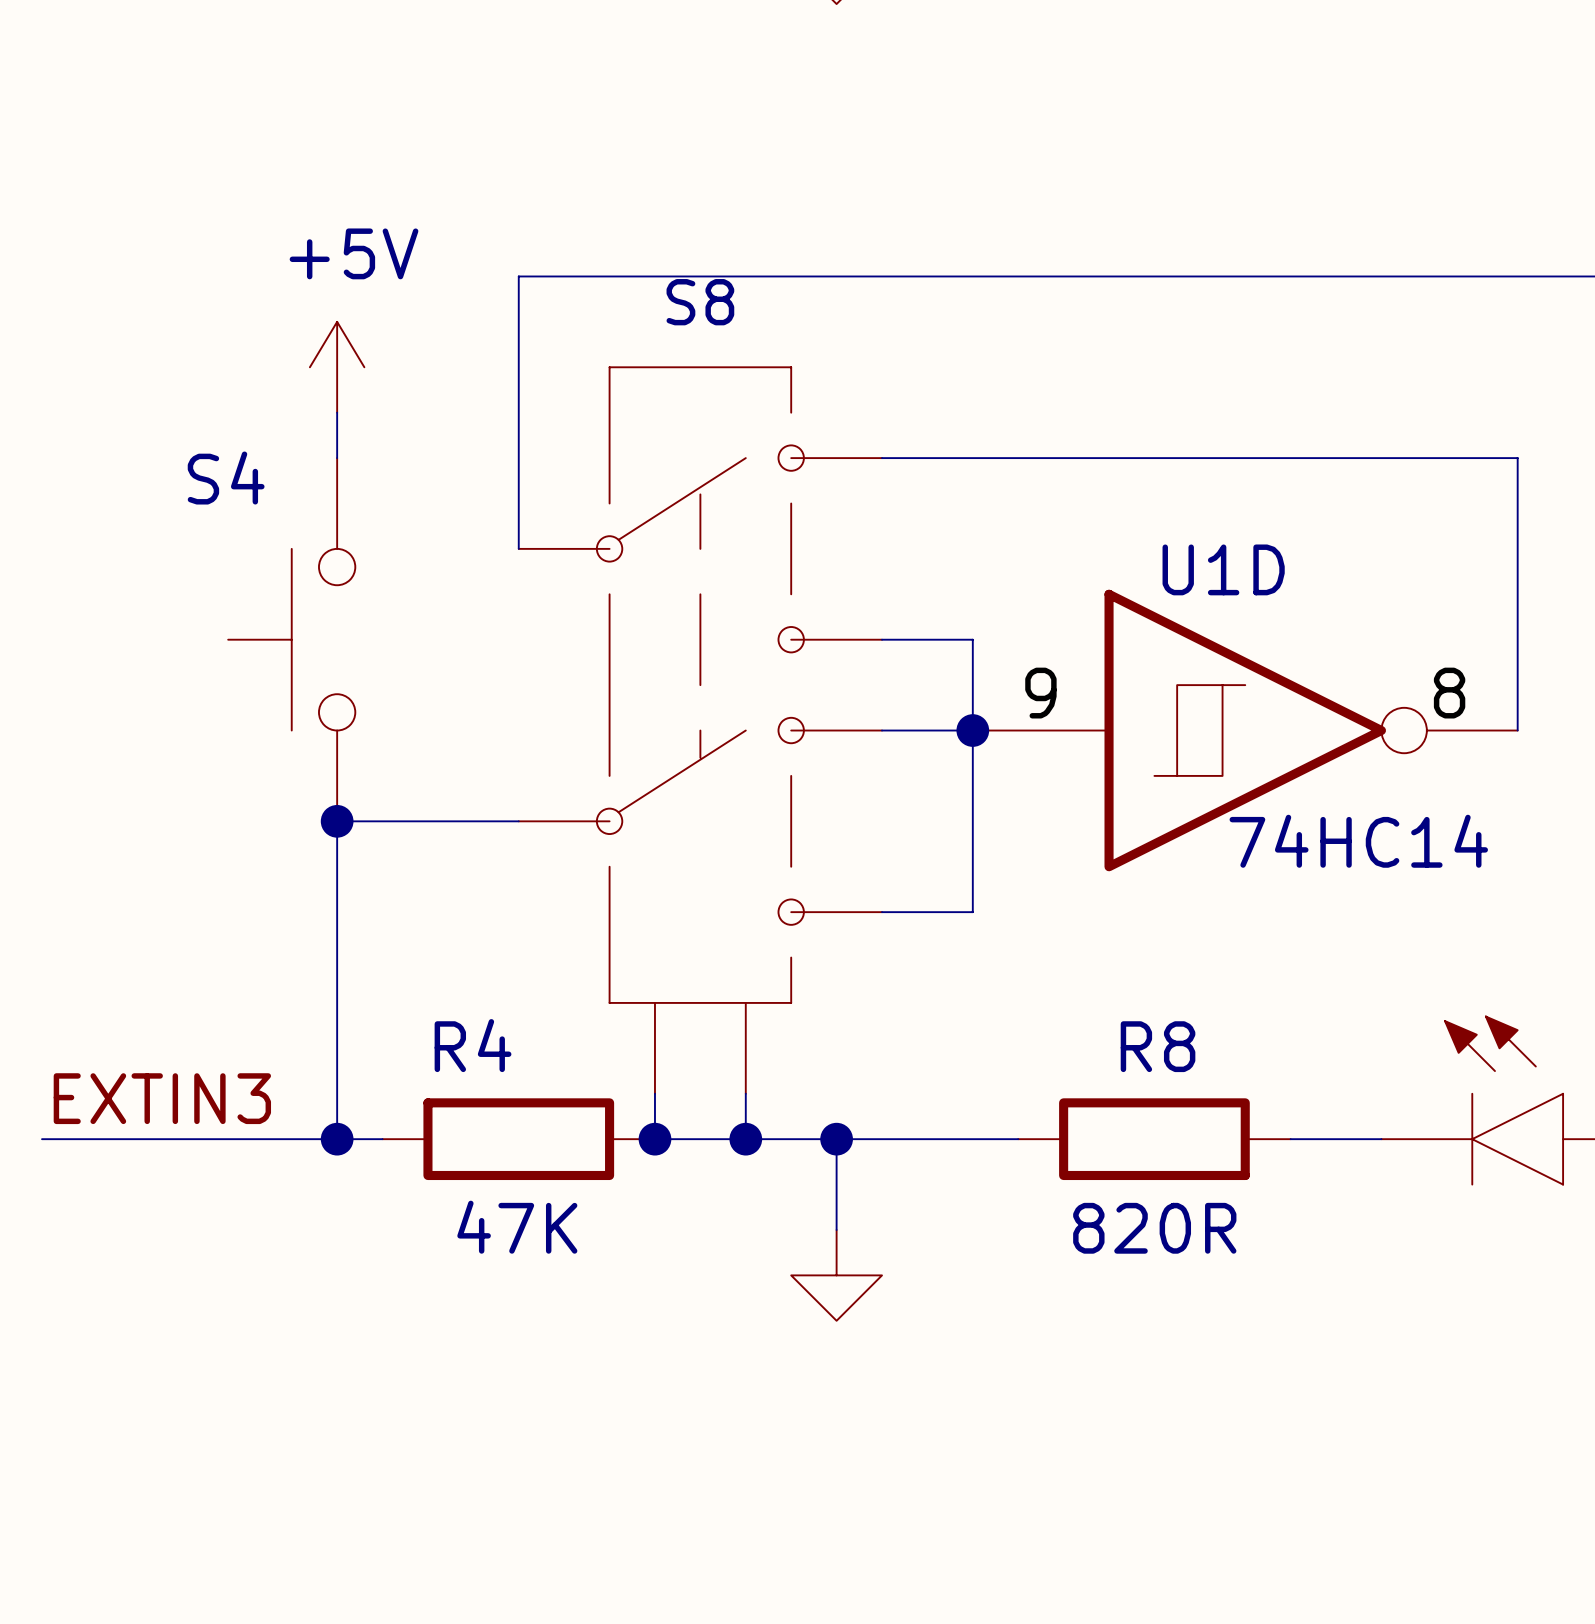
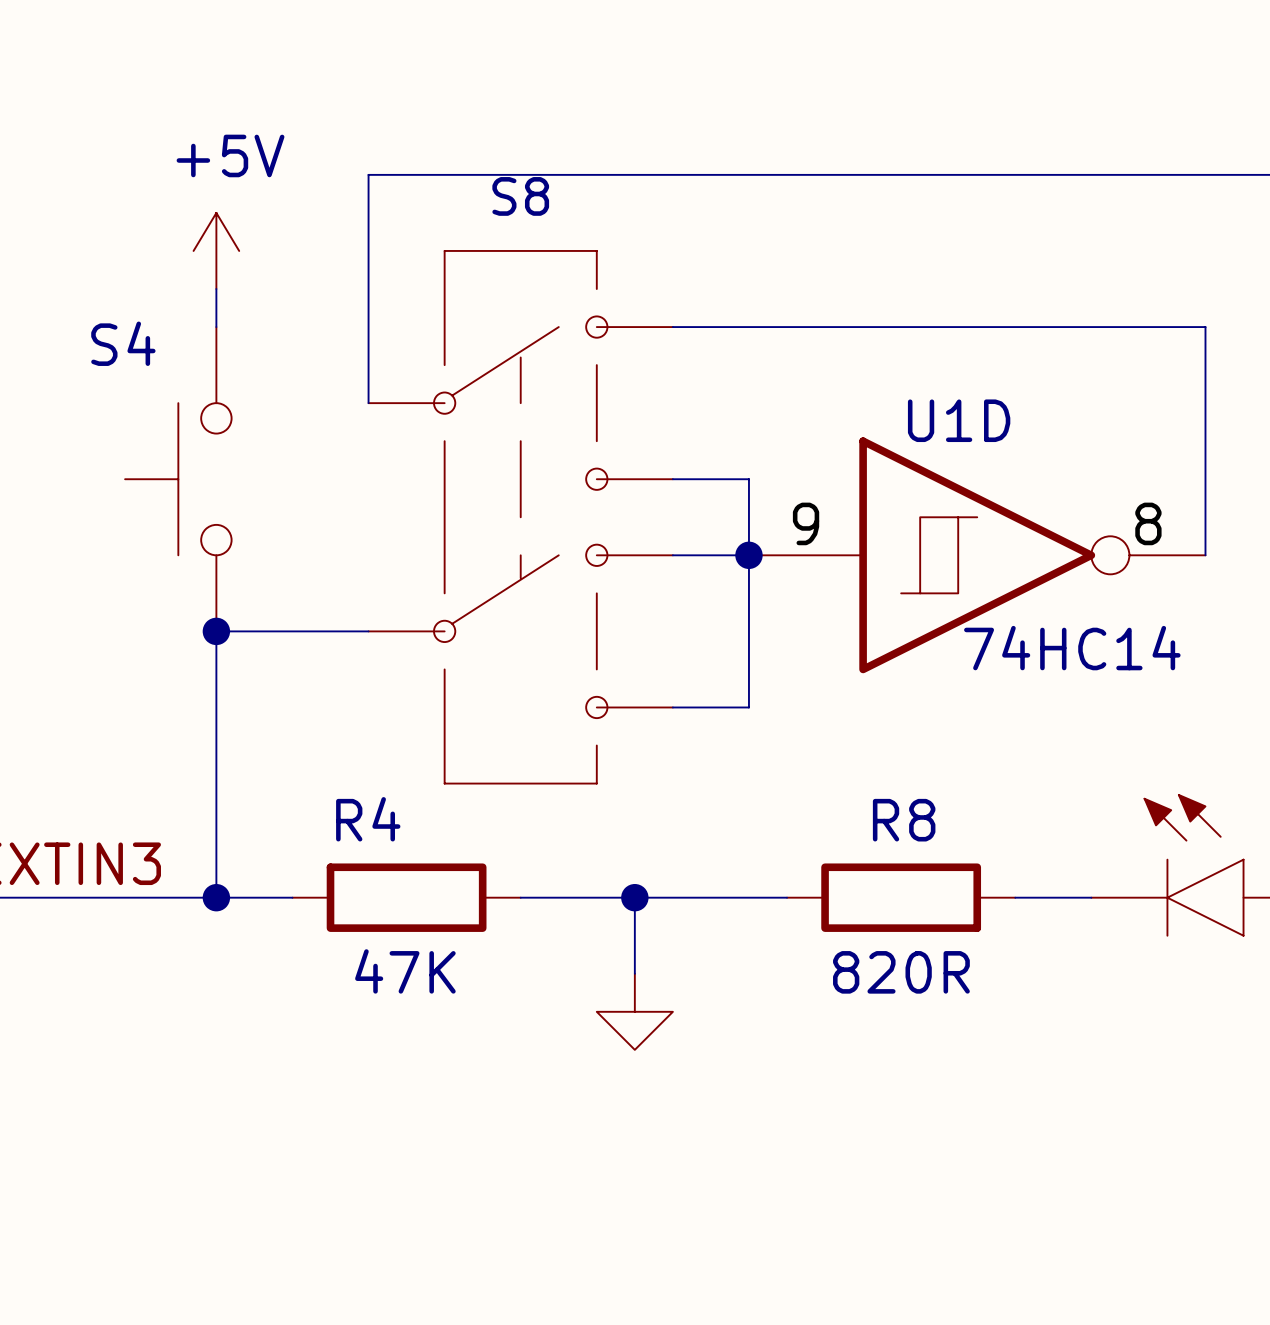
S8 symbol: [518, 367, 883, 1094] -> [368, 250, 673, 784]
wire: (745, 1093) (745, 1139) -> none
R4 position: (518, 1139) -> (406, 897)
junction: (654, 1139) -> none
junction: (745, 1139) -> none

